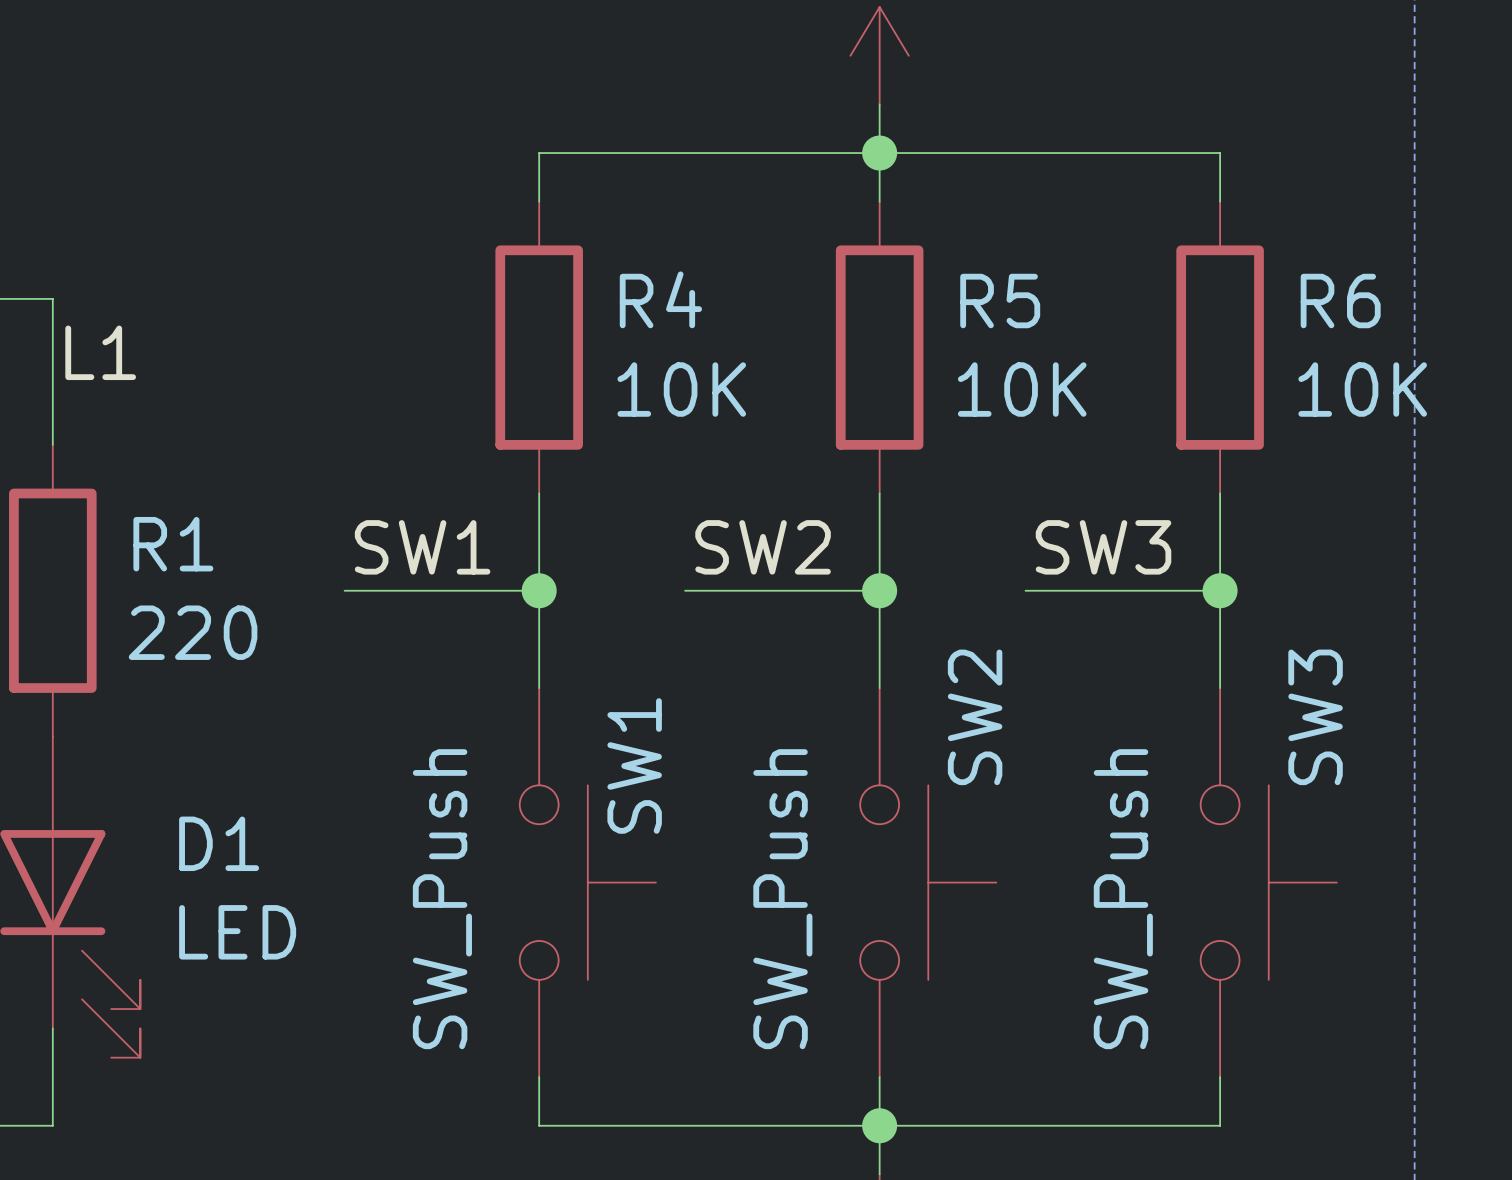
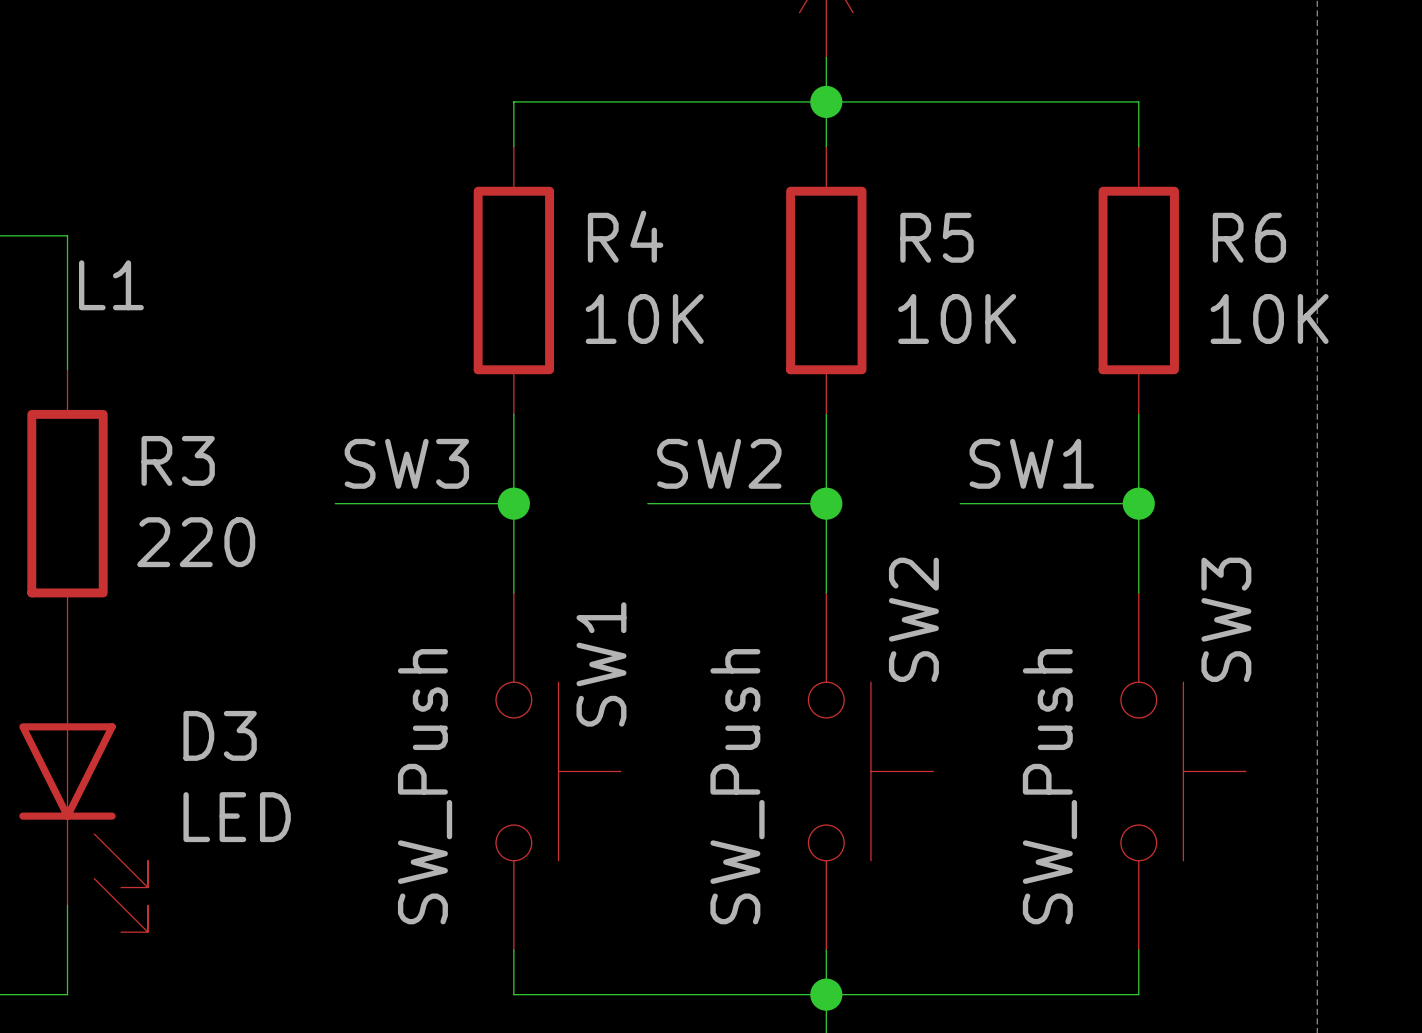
R1 name: R1 (173, 544) -> R3 (178, 460)
label: SW1 (422, 547) -> SW3 (406, 463)
label: SW3 (1103, 547) -> SW1 (1031, 463)
D1 name: D1 (219, 843) -> D3 (220, 735)

